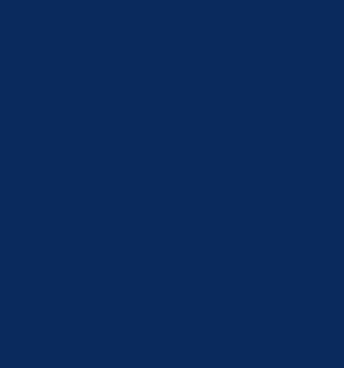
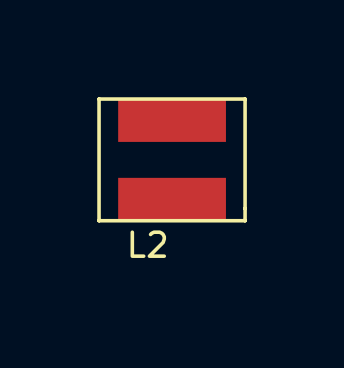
L2: none -> (172, 159)

